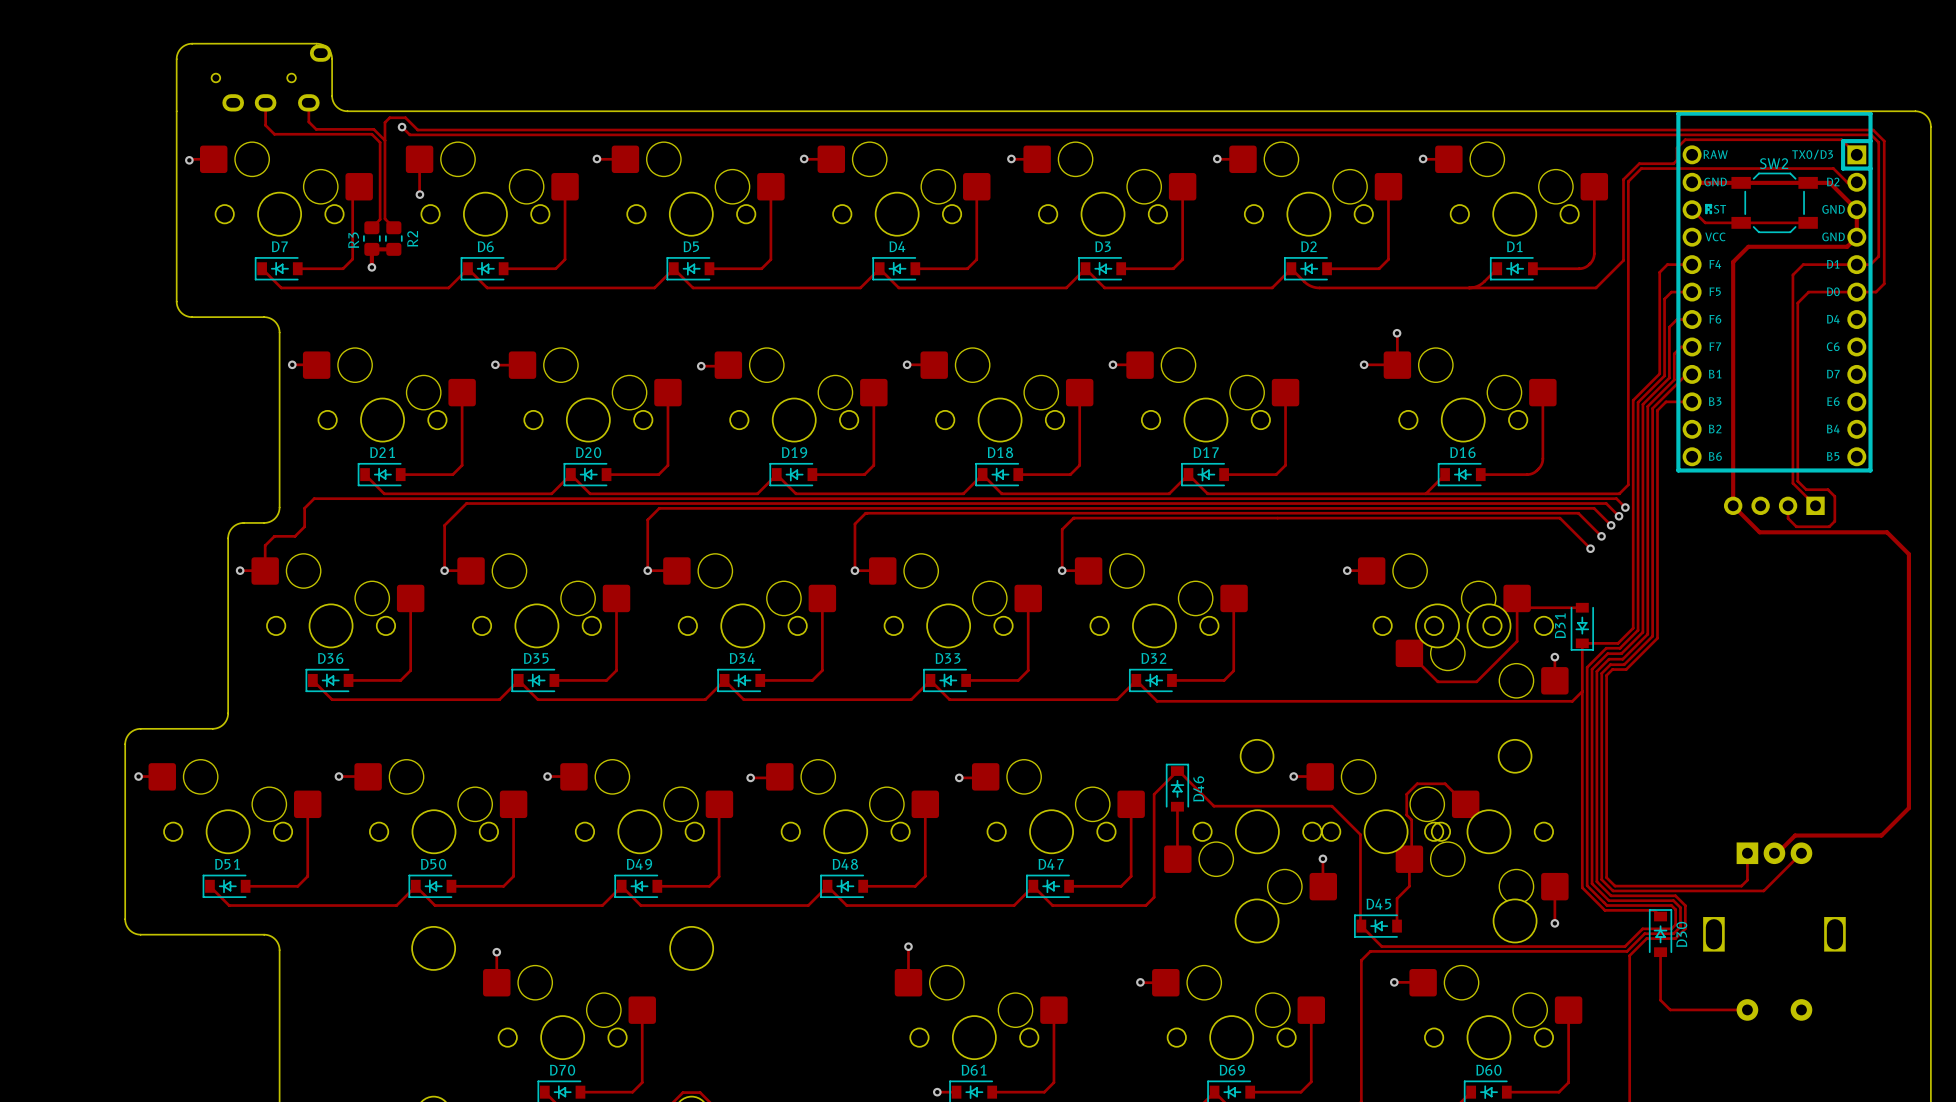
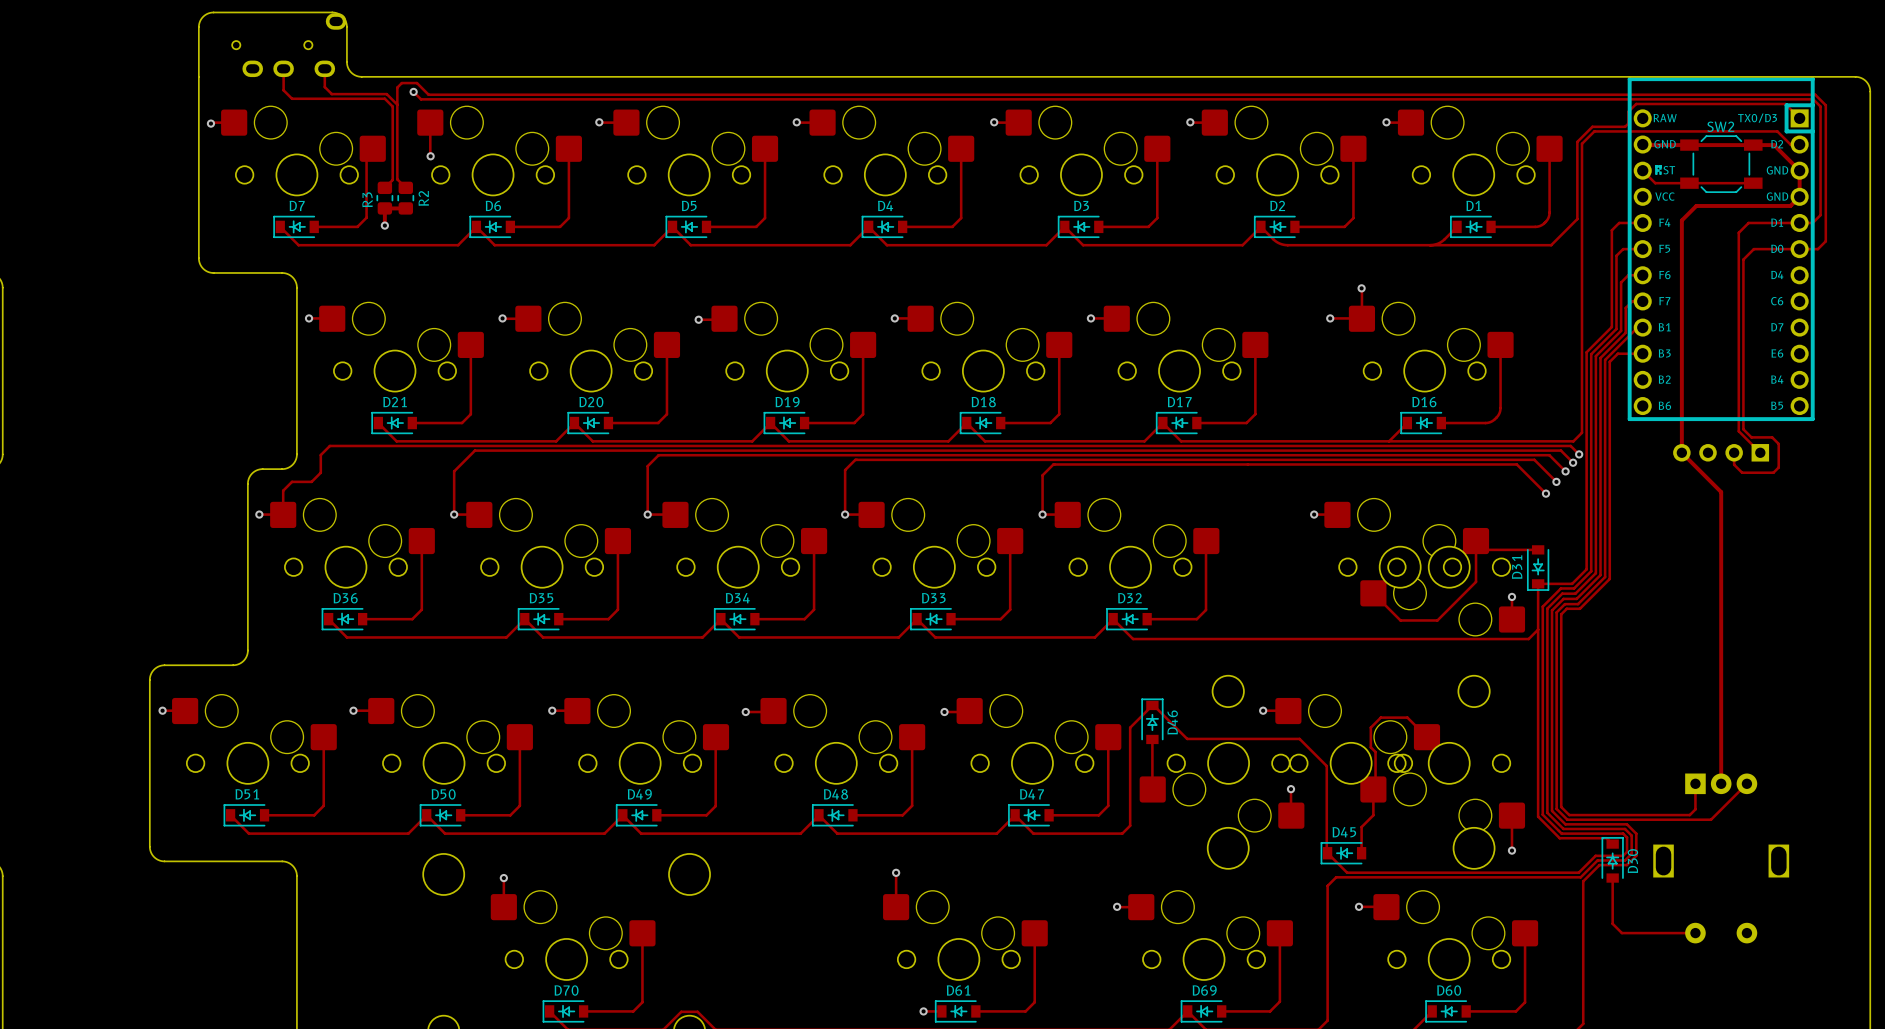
track: (1759, 532) (1887, 532) (1908, 554) (1908, 808) (1881, 835) (1795, 835) (1777, 853) (1774, 853) -> (1707, 478) (1721, 492) (1721, 783)

